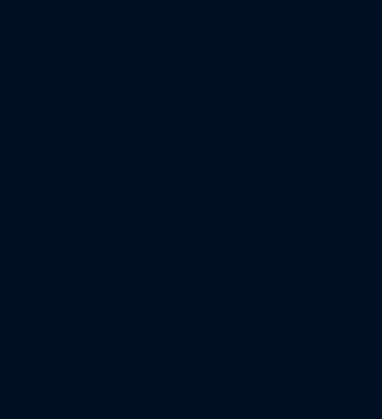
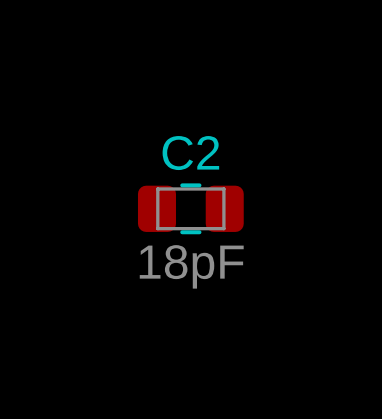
C2: none -> 18pF (190, 208)

